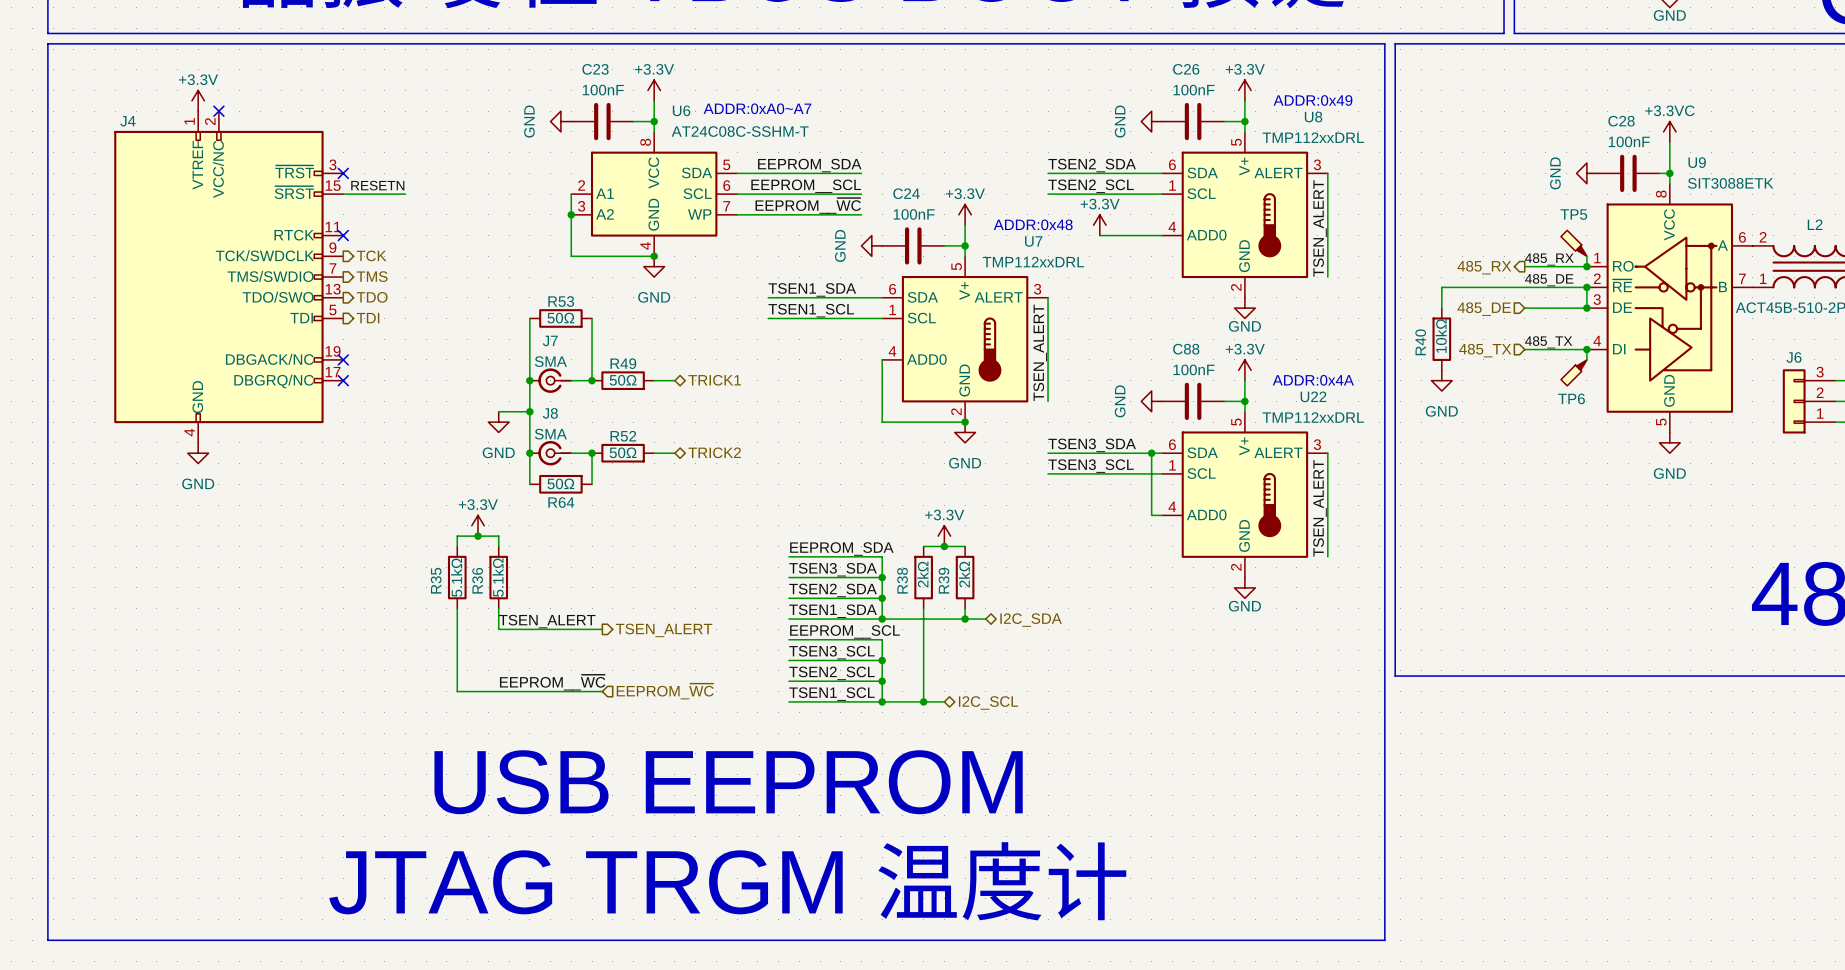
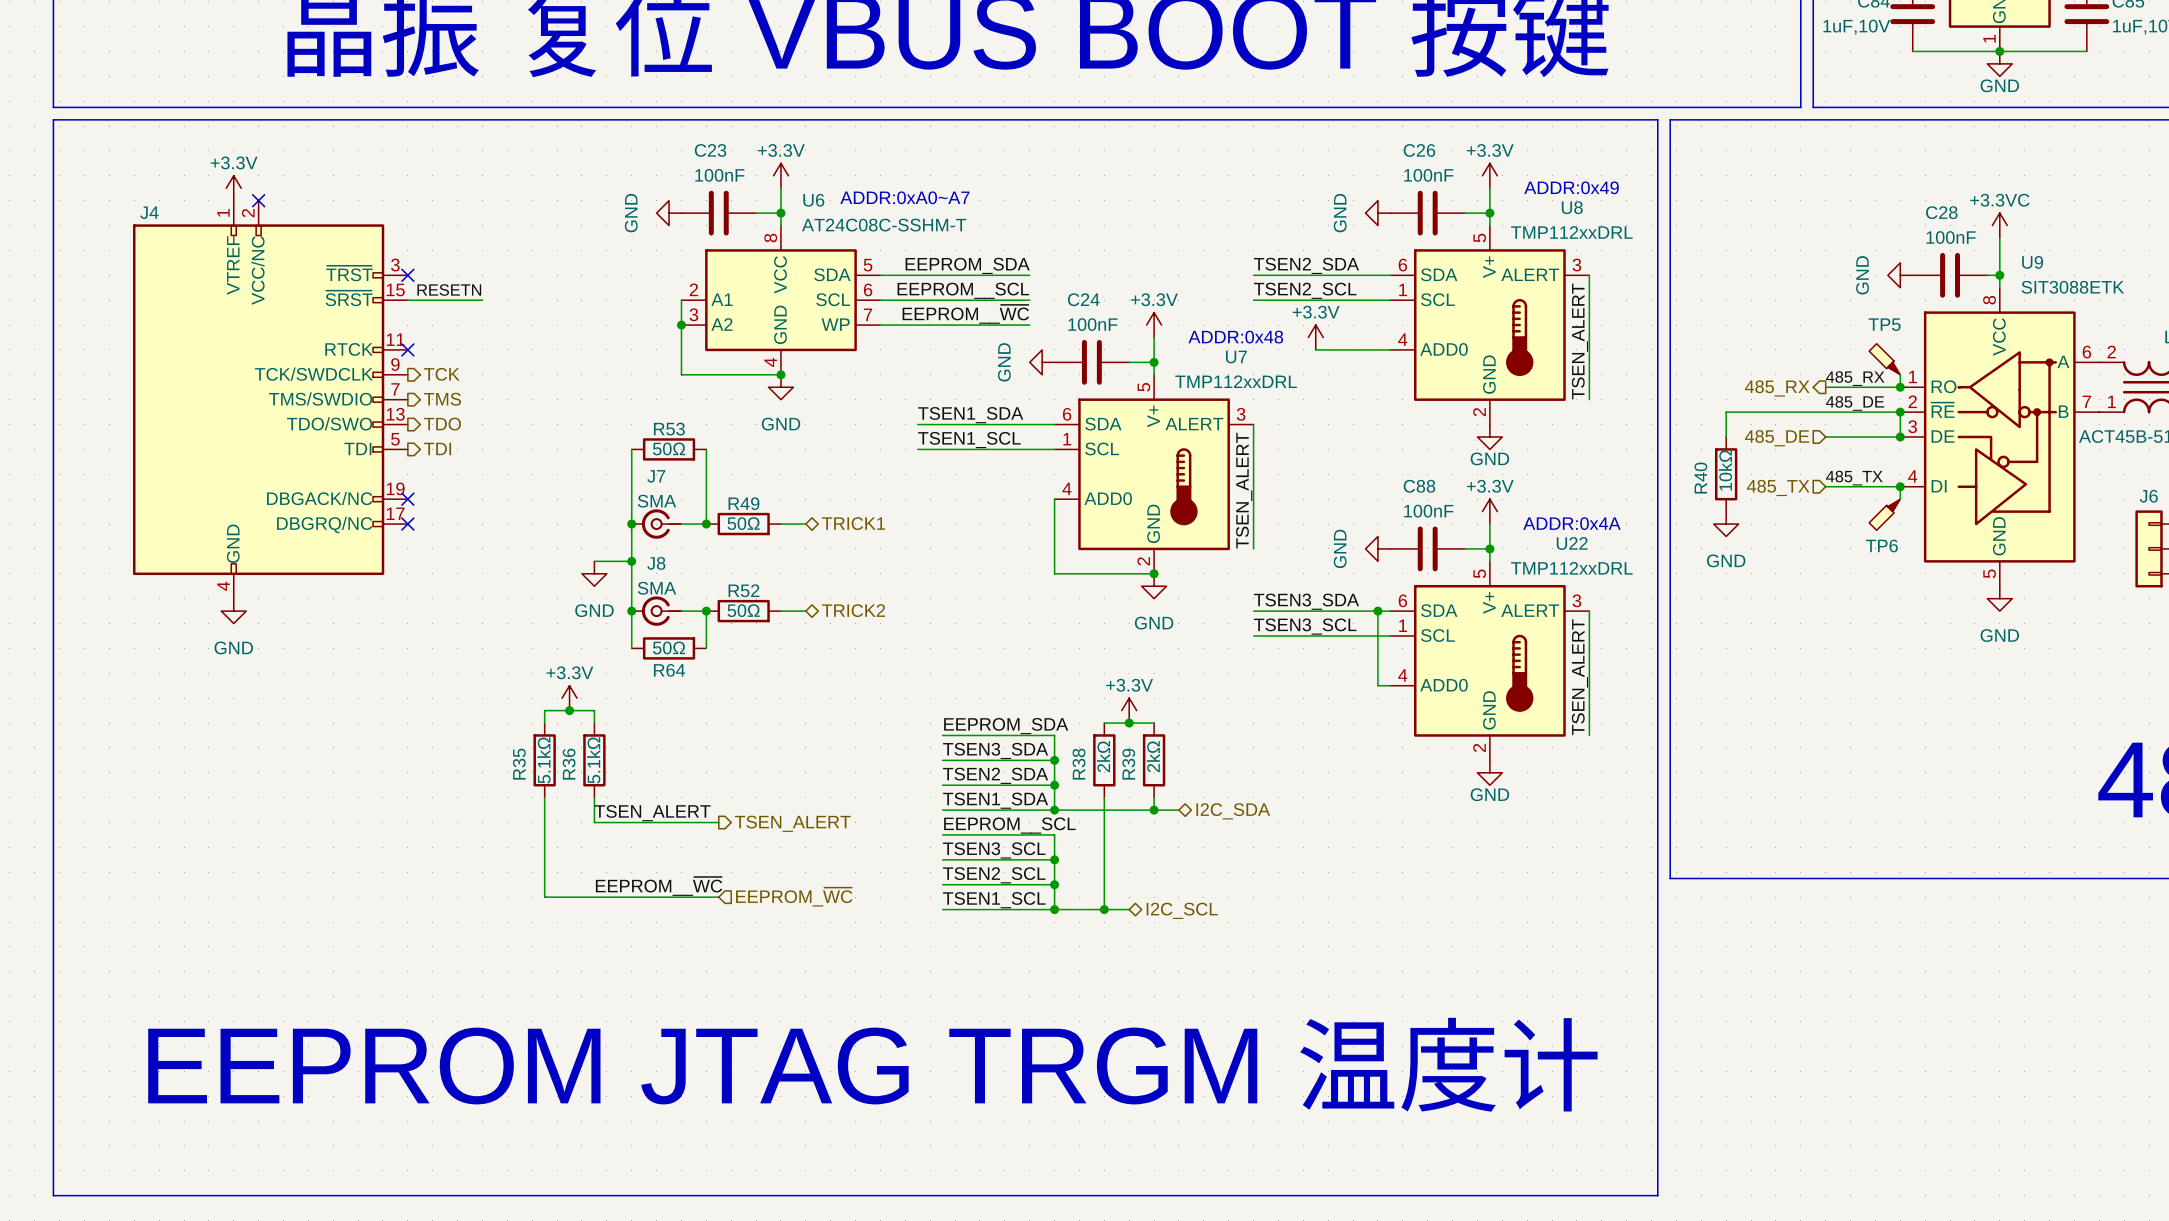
text: USB EEPROM (728, 782) -> none
text: JTAG TRGM 温度计 (727, 881) -> EEPROM JTAG TRGM 温度计 (872, 1064)

